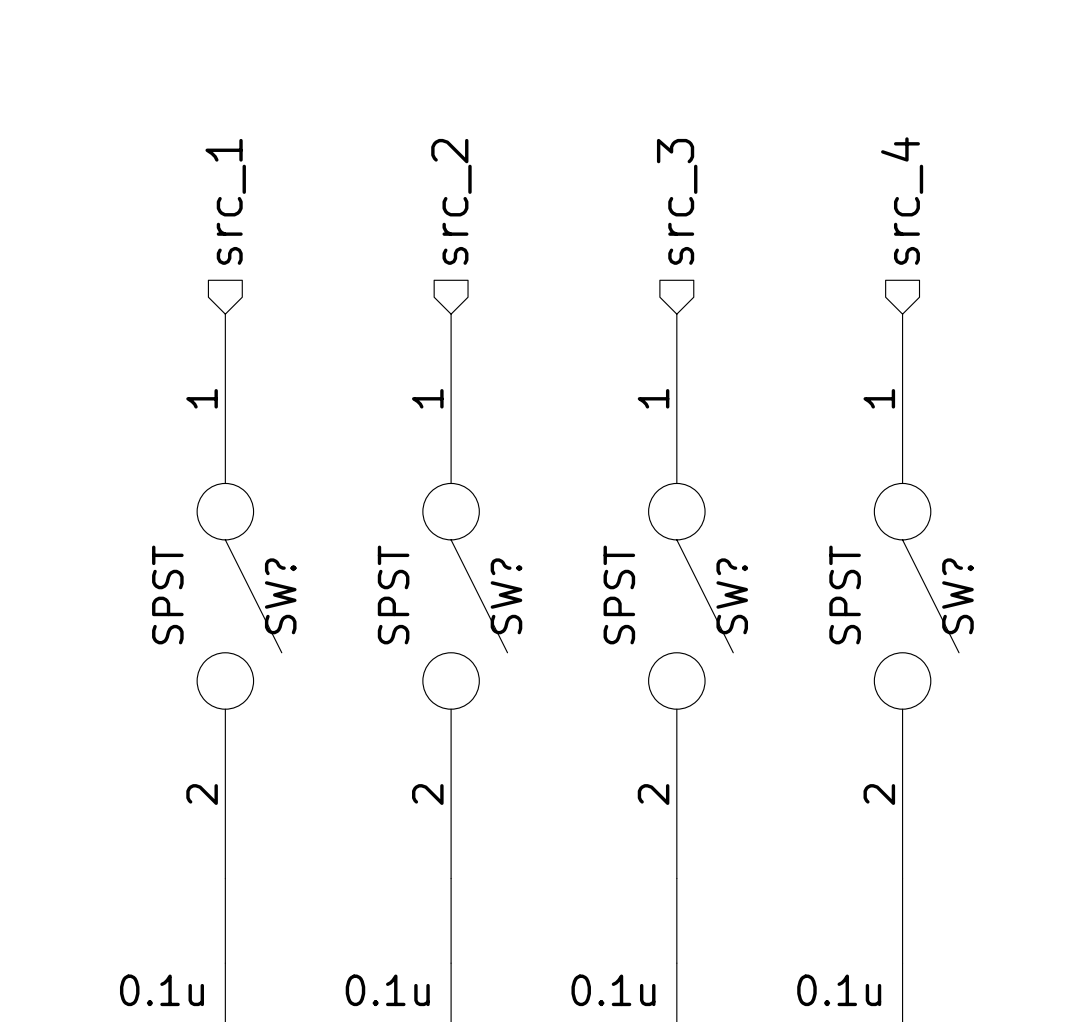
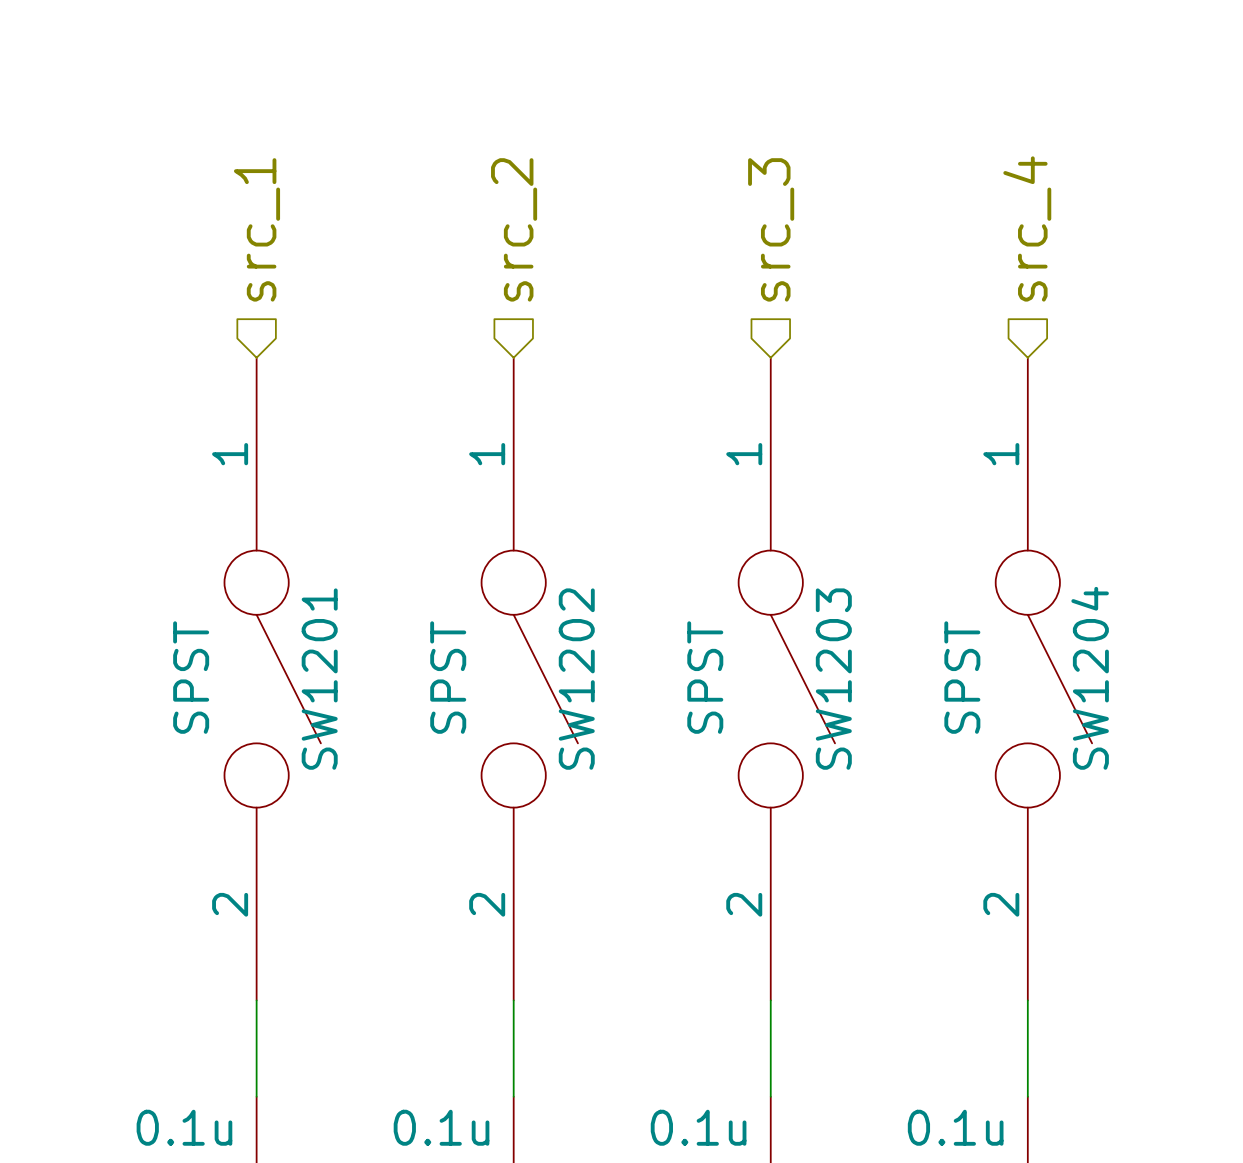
SW? name: SW? (280, 596) -> SW1201 (319, 679)
SW? name: SW? (506, 596) -> SW1202 (576, 679)
SW? name: SW? (732, 596) -> SW1203 (833, 679)
SW? name: SW? (957, 596) -> SW1204 (1090, 678)

